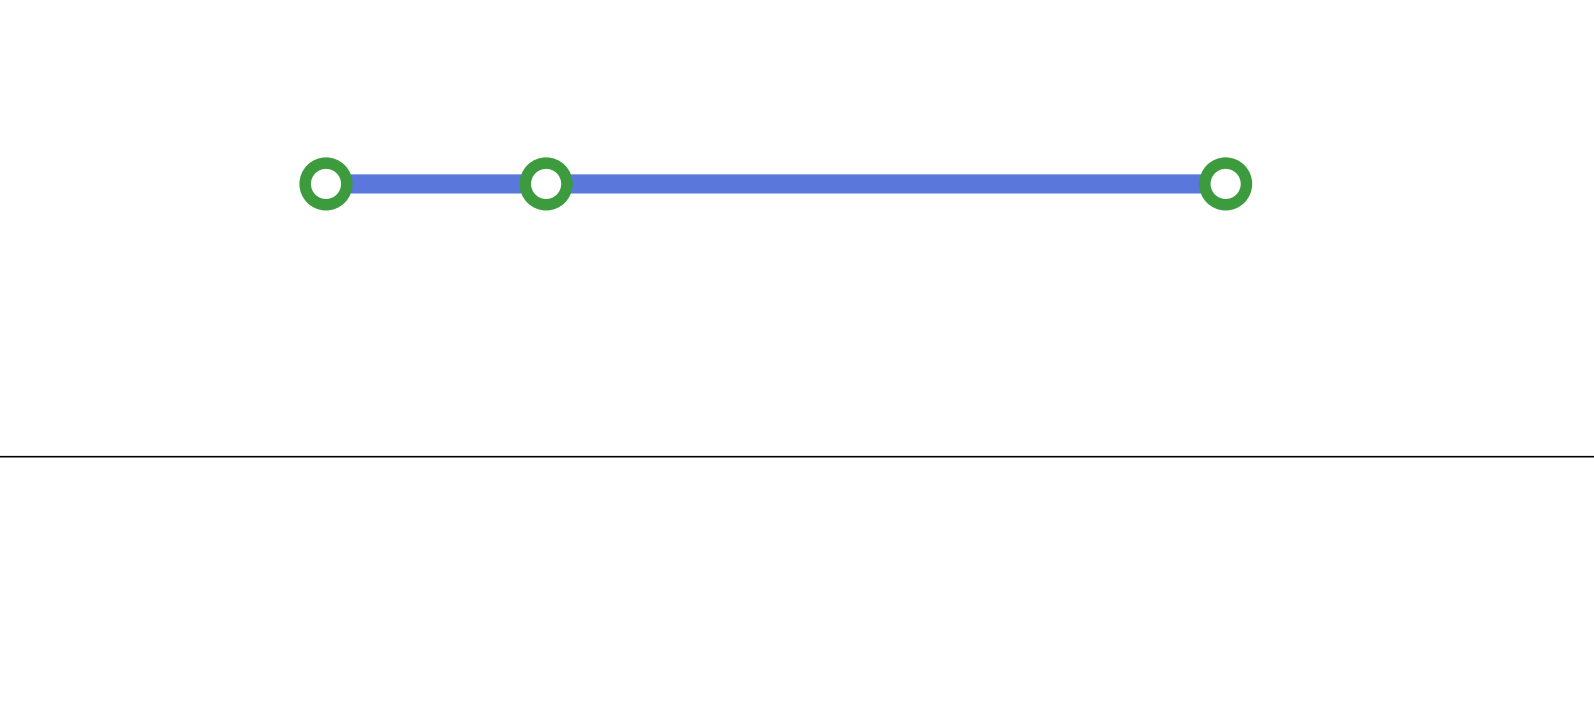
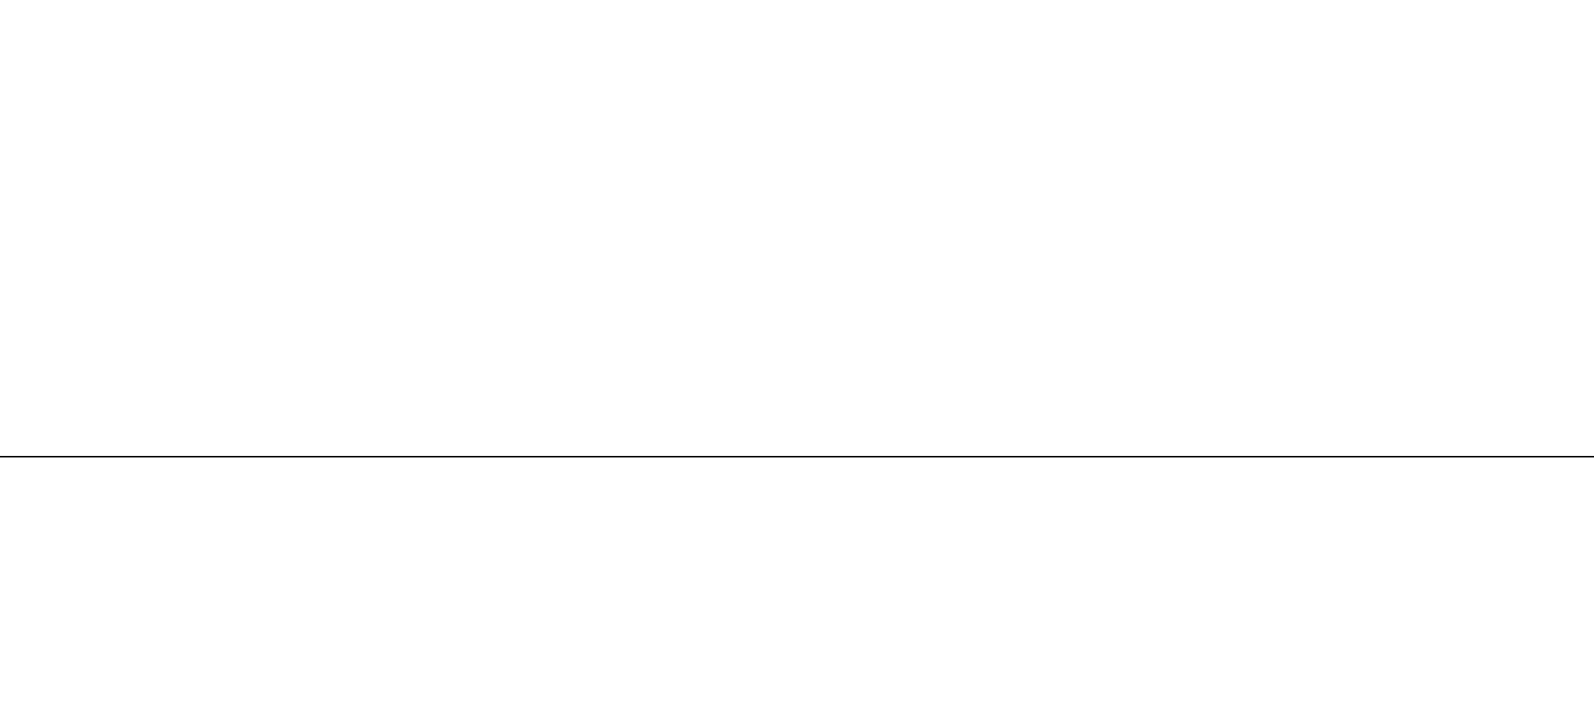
via: (325, 183) -> none
via: (546, 183) -> none
track: (1225, 183) (325, 183) -> none
via: (1225, 183) -> none

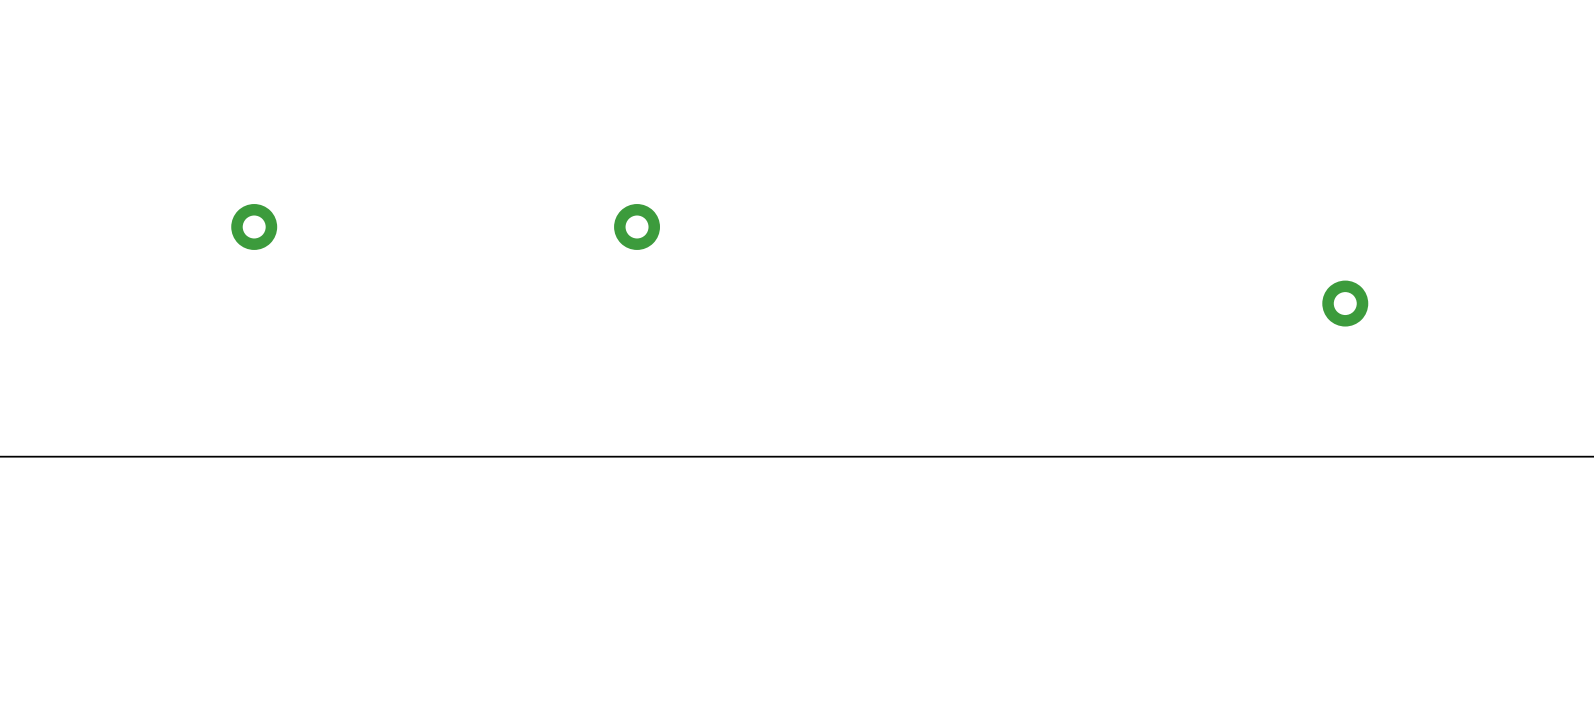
via: none -> (254, 226)
via: none -> (637, 226)
via: none -> (1345, 303)

